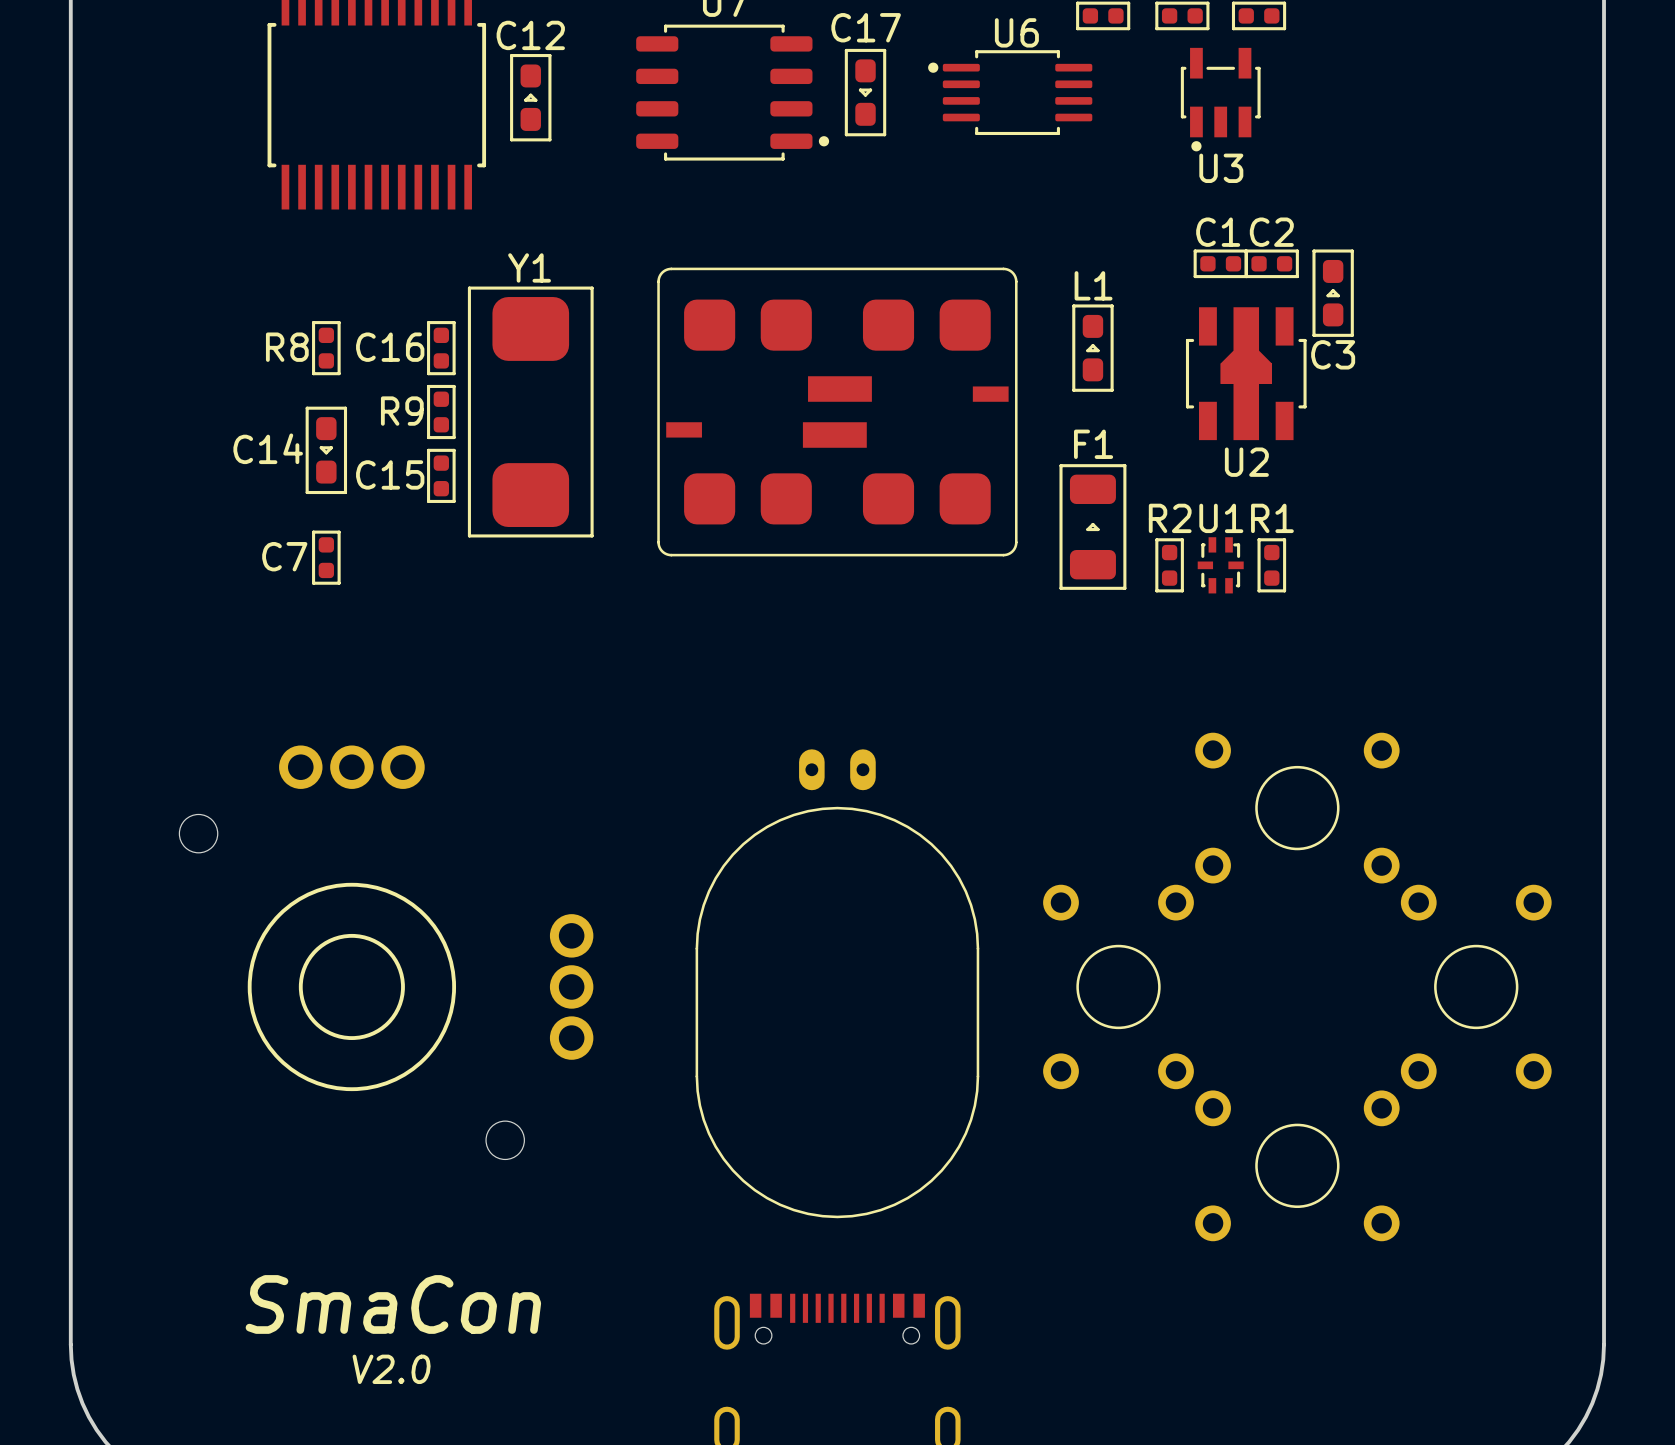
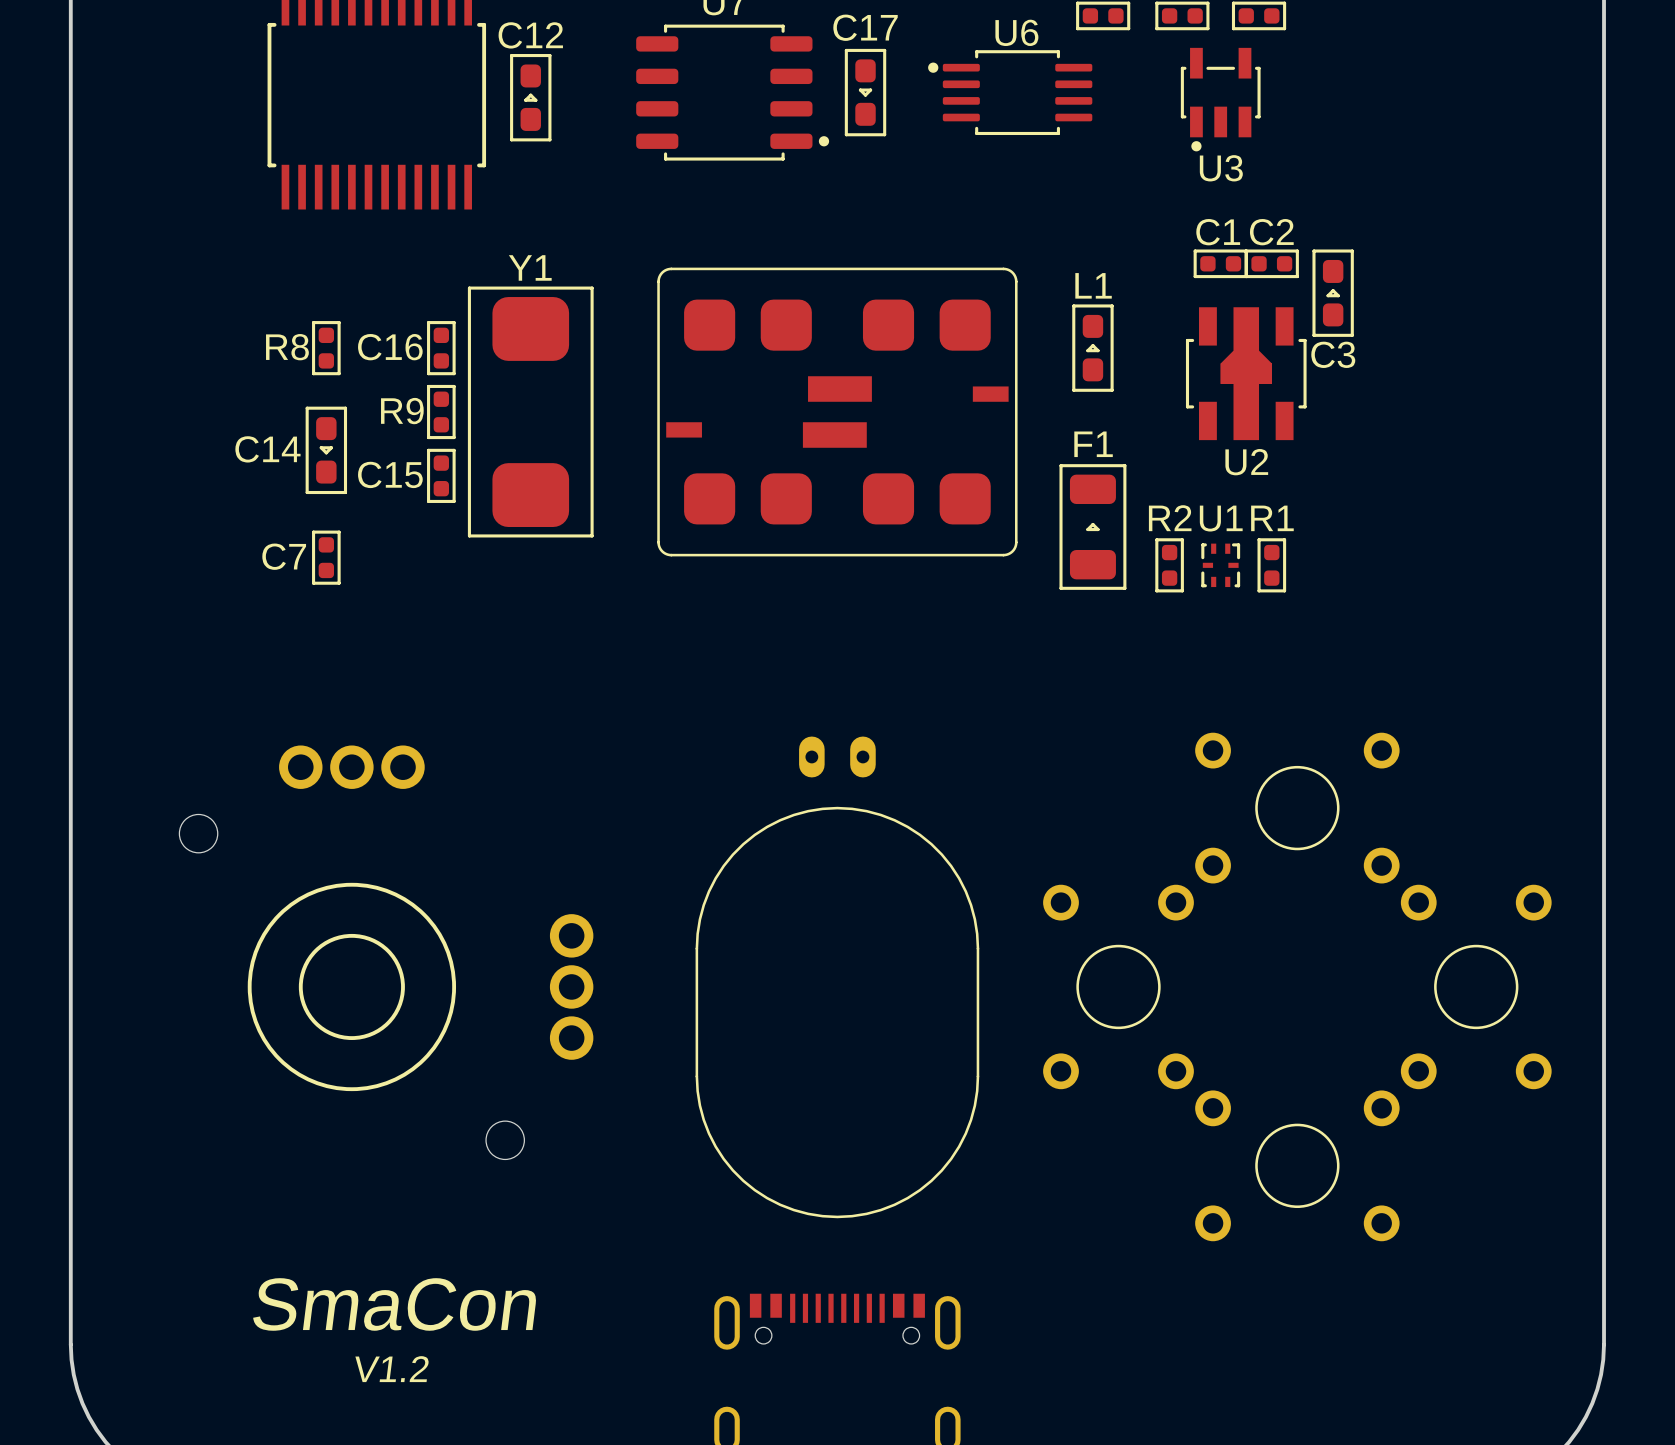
U1 footprint: [1197, 537, 1244, 594] -> [1201, 543, 1241, 588]
part footprint: [695, 749, 980, 1219] -> [695, 736, 980, 1219]
text: V2.0 (391, 1369) -> V1.2 (392, 1369)

